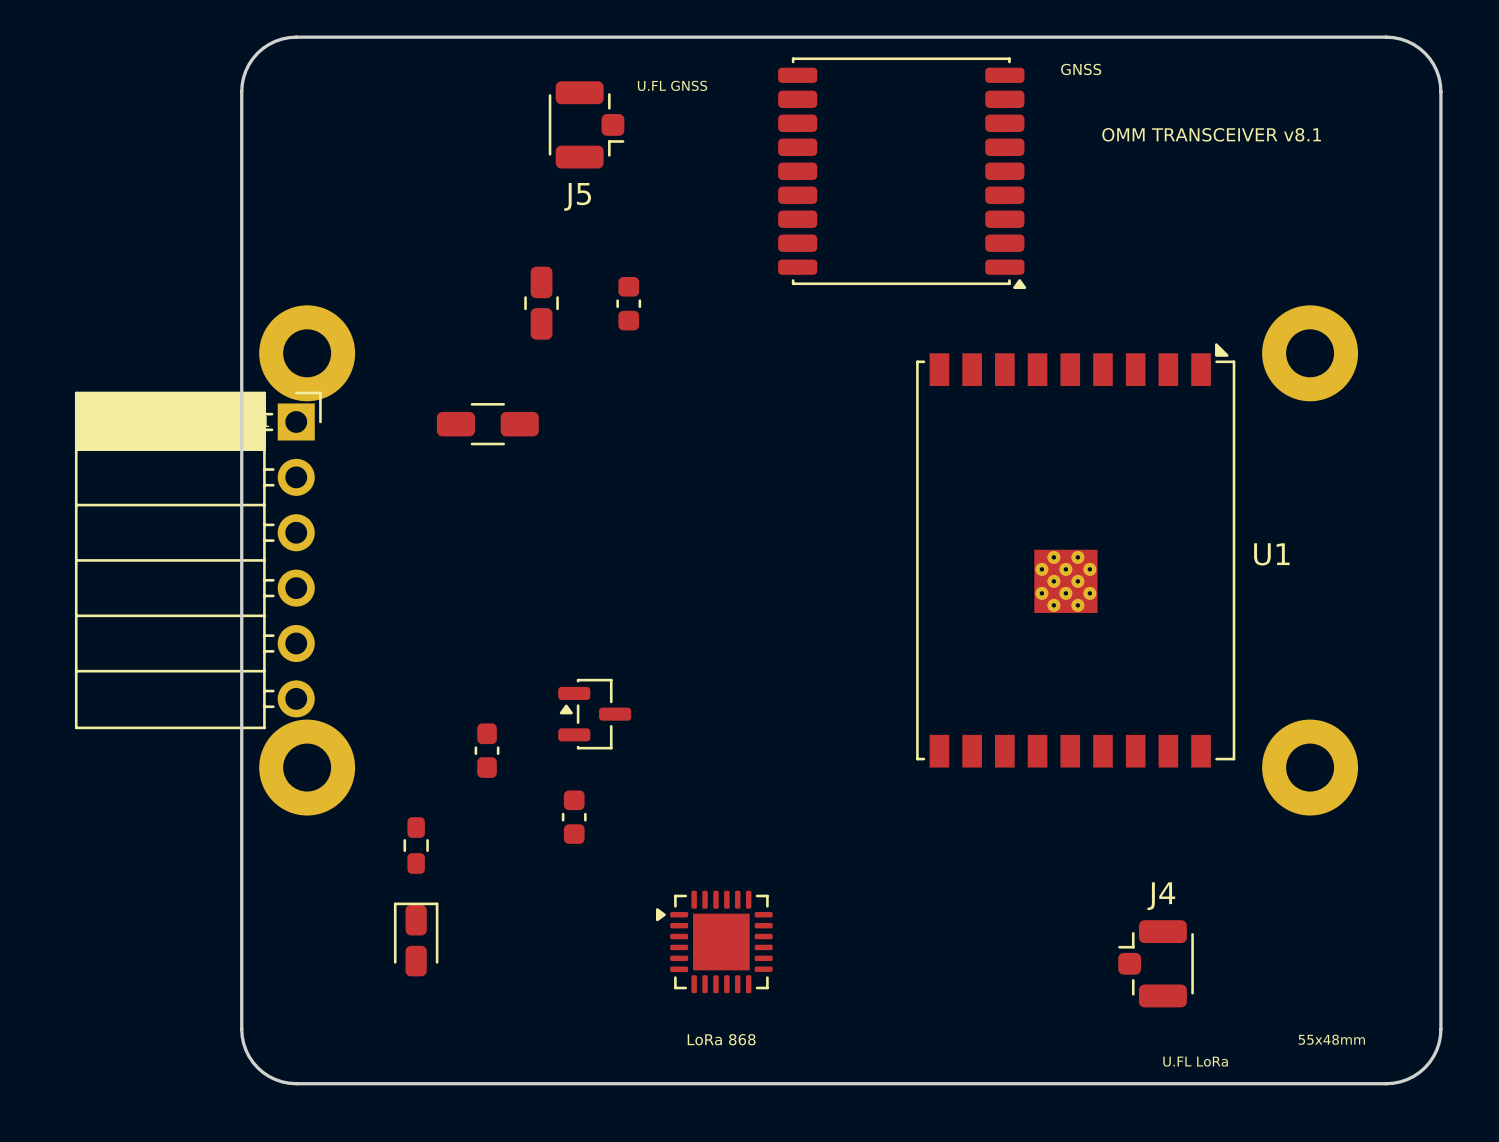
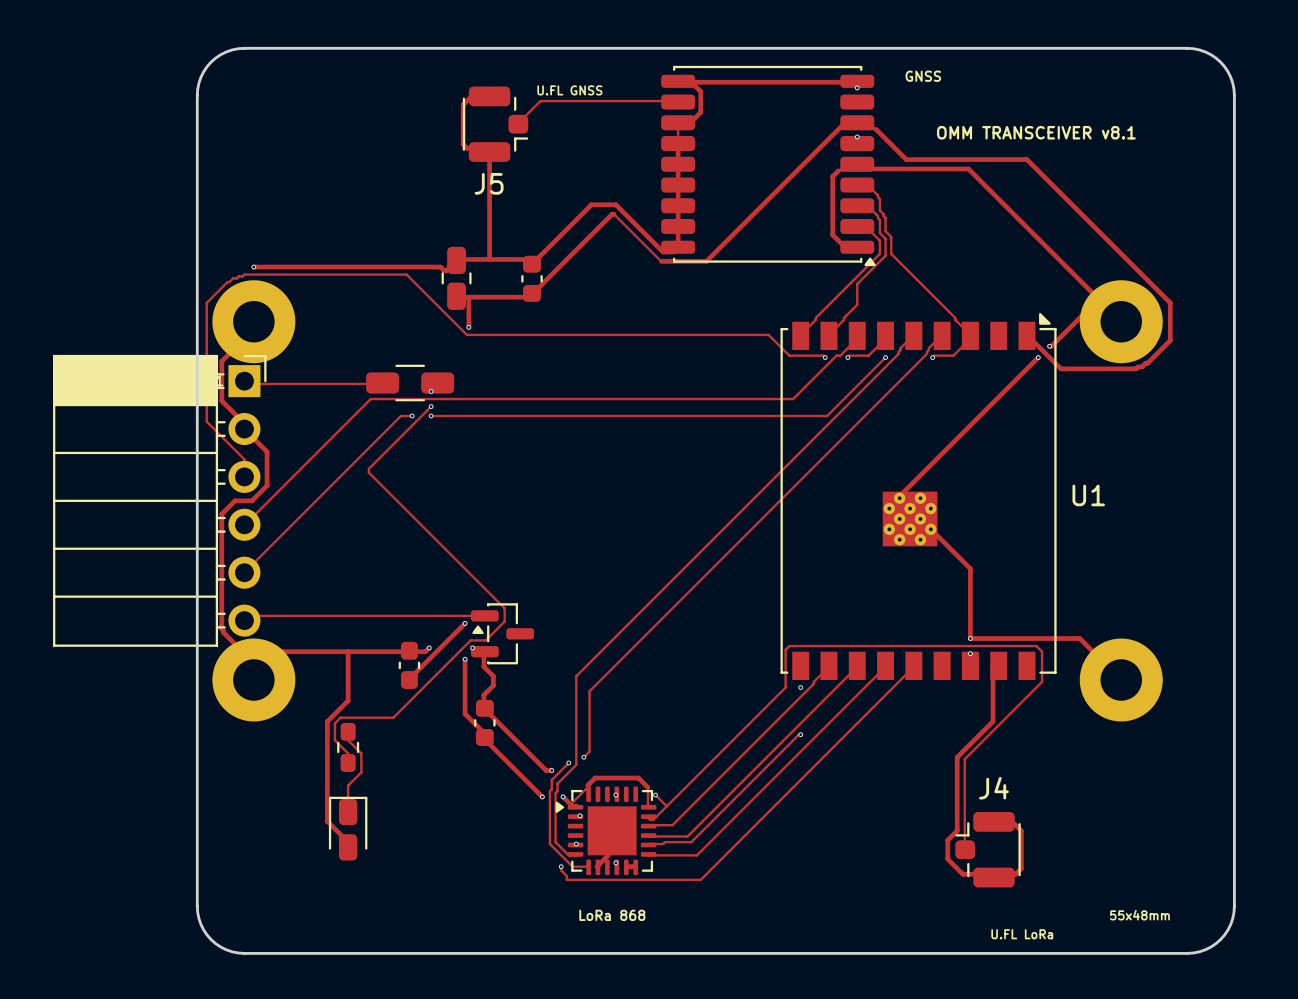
track: none -> (678, 81) (857, 82)
track: none -> (691, 82) (700, 91) (700, 112) (689, 123) (678, 123)
via: none -> (857, 87)
track: none -> (489, 96) (470, 97) (463, 104) (463, 144) (466, 148) (485, 148) (489, 152) (489, 259)
track: none -> (678, 102) (540, 101) (518, 124)
track: none -> (678, 123) (678, 248) (674, 251) (663, 251) (615, 204) (591, 204) (531, 264)
via: none -> (857, 136)
track: none -> (857, 185) (866, 184) (879, 199) (879, 210) (885, 218) (885, 231) (891, 236) (891, 253) (970, 334) (970, 338) (953, 355) (934, 355) (932, 357)
track: none -> (857, 205) (868, 206) (878, 216) (879, 233) (885, 238) (885, 255) (857, 284) (857, 304) (828, 335)
track: none -> (857, 226) (864, 225) (879, 240) (879, 253) (815, 317) (800, 335)
track: none -> (857, 247) (845, 248) (832, 234) (832, 176) (838, 170) (842, 168) (968, 168) (1121, 321)
track: none -> (532, 263) (529, 259) (457, 259) (446, 270) (440, 267) (253, 267)
via: none -> (253, 267)
track: none -> (456, 296) (529, 297) (612, 214) (661, 261) (706, 261) (844, 123) (857, 123) (861, 127) (876, 129) (906, 159) (1026, 159) (1170, 302) (1170, 340) (1147, 363) (1136, 368) (1060, 368) (1026, 335)
track: none -> (468, 297) (468, 327)
track: none -> (1098, 299) (1049, 346)
via: none -> (468, 327)
track: none -> (857, 334) (857, 338) (840, 355) (836, 355) (793, 399) (370, 399) (244, 525)
track: none -> (885, 334) (885, 338) (868, 355) (849, 355) (847, 357)
track: none -> (913, 335) (900, 348) (898, 353) (576, 676) (576, 764) (557, 783) (555, 793) (555, 842) (568, 855) (575, 854)
track: none -> (942, 335) (928, 348) (927, 353) (589, 691) (589, 751) (583, 757)
track: none -> (244, 338) (221, 361) (221, 400) (244, 423)
via: none -> (1049, 346)
track: none -> (825, 357) (823, 355) (789, 355) (768, 334) (466, 334) (406, 274) (244, 274) (227, 282) (206, 302) (206, 421) (244, 459) (244, 476)
via: none -> (825, 357)
via: none -> (847, 357)
track: none -> (885, 357) (827, 416) (431, 416)
via: none -> (885, 357)
via: none -> (932, 357)
track: none -> (1038, 357) (889, 506)
via: none -> (1038, 357)
track: none -> (382, 383) (248, 383)
via: none -> (431, 391)
track: none -> (431, 406) (368, 468) (368, 472) (504, 608) (504, 621) (485, 640) (470, 640) (393, 717) (340, 717) (334, 723) (334, 740) (348, 753) (348, 762)
via: none -> (431, 406)
track: none -> (412, 416) (400, 416) (244, 572)
via: none -> (412, 416)
via: none -> (431, 416)
track: none -> (244, 429) (267, 451) (267, 485) (251, 500) (235, 500) (221, 514) (221, 629) (223, 632) (253, 663) (265, 651) (425, 651) (429, 647)
track: none -> (930, 529) (970, 568) (970, 638) (1079, 638) (1121, 679)
track: none -> (250, 615) (484, 615)
track: none -> (465, 623) (409, 679)
via: none -> (465, 623)
via: none -> (970, 638)
via: none -> (429, 647)
via: none -> (472, 647)
track: none -> (348, 651) (348, 700) (327, 721) (327, 821) (348, 842) (348, 847)
track: none -> (483, 651) (483, 666) (493, 676) (493, 685) (483, 695) (483, 708)
via: none -> (970, 653)
track: none -> (465, 659) (465, 713) (483, 732) (483, 738)
via: none -> (465, 659)
track: none -> (828, 665) (813, 683) (672, 825) (648, 826)
track: none -> (857, 665) (687, 836) (648, 835)
track: none -> (885, 665) (696, 855) (648, 854)
track: none -> (913, 665) (700, 879) (566, 879) (561, 866)
track: none -> (993, 666) (993, 721) (957, 757) (957, 830) (947, 840) (947, 859) (962, 874) (1015, 874) (1021, 868) (1021, 830) (1011, 821) (993, 821)
via: none -> (800, 687)
track: none -> (483, 708) (546, 770) (551, 770)
track: none -> (348, 730) (348, 740) (361, 753) (361, 772) (348, 785) (348, 811)
track: none -> (800, 734) (691, 842) (664, 842) (663, 844) (648, 844)
via: none -> (800, 734)
track: none -> (483, 738) (542, 796)
via: none -> (583, 757)
track: none -> (568, 762) (551, 779) (551, 789) (549, 791) (549, 844) (572, 866) (588, 867)
via: none -> (568, 762)
via: none -> (551, 770)
via: none -> (615, 795)
track: none -> (655, 795) (666, 806)
via: none -> (655, 795)
via: none -> (542, 796)
track: none -> (563, 796) (575, 807)
via: none -> (563, 796)
track: none -> (570, 804) (595, 778) (638, 778) (647, 787) (648, 807)
via: none -> (580, 815)
track: none -> (648, 816) (649, 819) (653, 819) (785, 687) (785, 649) (789, 646) (1036, 646) (1042, 651) (1042, 681) (964, 759) (965, 849)
via: none -> (576, 844)
track: none -> (608, 855) (597, 867)
via: none -> (615, 862)
via: none -> (561, 866)
track: none -> (626, 867) (635, 867)

